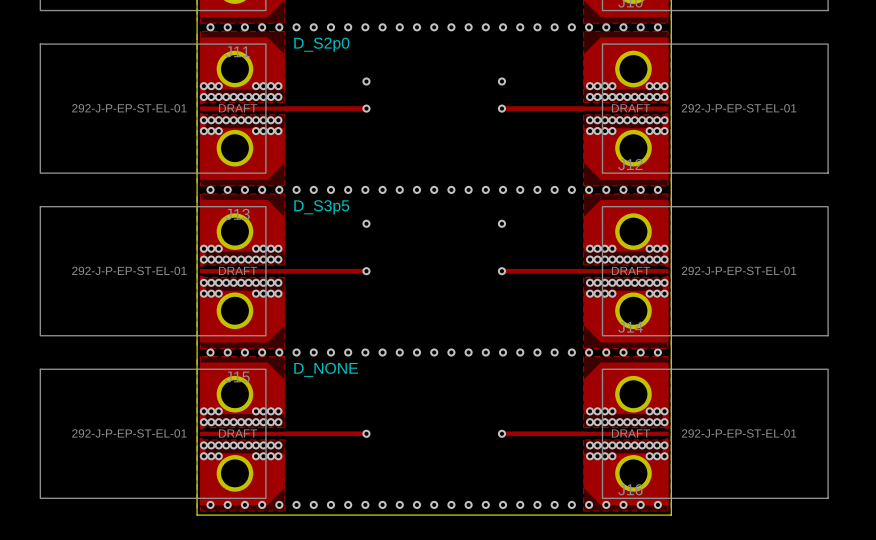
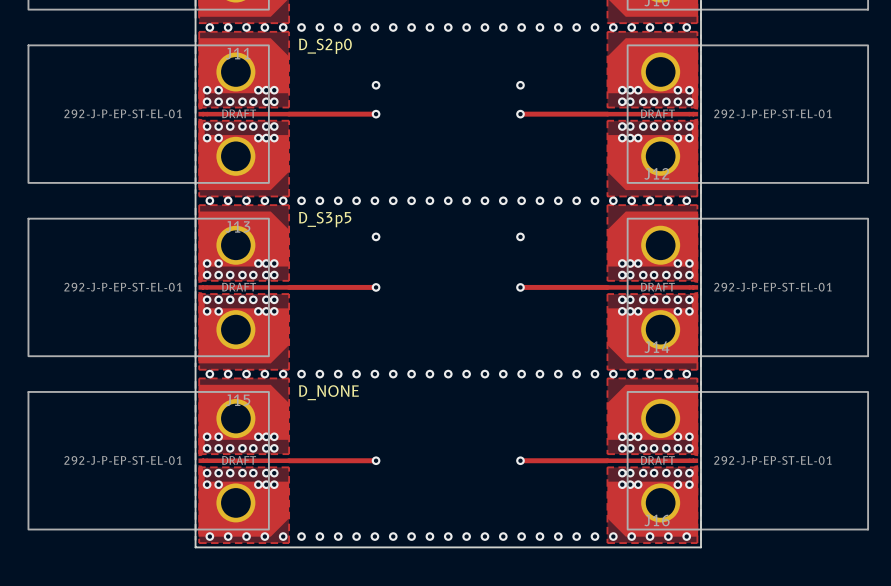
via: (203, 86) -> none
via: none -> (207, 90)
via: (211, 86) -> none
via: (278, 86) -> none
via: (590, 86) -> none
via: (657, 86) -> none
via: none -> (689, 90)
via: (664, 86) -> none
via: (203, 96) -> none
via: none -> (207, 101)
via: (211, 96) -> none
via: (226, 96) -> none
via: none -> (230, 101)
via: (233, 96) -> none
via: (248, 96) -> none
via: none -> (253, 101)
via: (256, 96) -> none
via: (278, 96) -> none
via: (590, 96) -> none
via: (612, 96) -> none
via: none -> (643, 101)
via: (619, 96) -> none
via: (634, 96) -> none
via: none -> (666, 101)
via: (642, 96) -> none
via: (657, 96) -> none
via: none -> (689, 101)
via: (664, 96) -> none
via: (203, 120) -> none
via: none -> (207, 126)
via: (211, 120) -> none
via: (226, 120) -> none
via: none -> (230, 126)
via: (233, 120) -> none
via: (248, 120) -> none
via: none -> (253, 126)
via: (256, 120) -> none
via: (278, 120) -> none
via: (590, 120) -> none
via: (612, 120) -> none
via: none -> (643, 126)
via: (619, 120) -> none
via: (634, 120) -> none
via: none -> (666, 126)
via: (642, 120) -> none
via: (657, 120) -> none
via: none -> (689, 126)
via: (664, 120) -> none
via: (203, 131) -> none
via: none -> (207, 138)
via: (211, 131) -> none
via: (278, 131) -> none
via: (590, 131) -> none
via: (657, 131) -> none
via: none -> (689, 138)
via: (664, 131) -> none
via: (203, 248) -> none
via: none -> (207, 263)
via: (211, 248) -> none
via: (278, 248) -> none
via: (590, 248) -> none
via: (657, 248) -> none
via: none -> (689, 263)
via: (664, 248) -> none
via: (203, 259) -> none
via: none -> (207, 275)
via: (211, 259) -> none
via: (226, 259) -> none
via: none -> (230, 275)
via: (233, 259) -> none
via: (248, 259) -> none
via: none -> (253, 275)
via: (256, 259) -> none
via: (278, 259) -> none
via: (590, 259) -> none
via: (612, 259) -> none
via: none -> (643, 275)
via: (619, 259) -> none
via: (634, 259) -> none
via: none -> (666, 275)
via: (642, 259) -> none
via: (657, 259) -> none
via: none -> (689, 275)
via: (664, 259) -> none
via: (203, 282) -> none
via: none -> (207, 299)
via: (211, 282) -> none
via: (226, 282) -> none
via: none -> (230, 299)
via: (233, 282) -> none
via: (248, 282) -> none
via: none -> (253, 299)
via: (256, 282) -> none
via: (278, 282) -> none
via: (590, 282) -> none
via: (612, 282) -> none
via: none -> (643, 299)
via: (619, 282) -> none
via: (634, 282) -> none
via: none -> (666, 299)
via: (642, 282) -> none
via: (657, 282) -> none
via: none -> (689, 299)
via: (664, 282) -> none
via: (203, 293) -> none
via: none -> (207, 311)
via: (211, 293) -> none
via: (278, 293) -> none
via: (590, 293) -> none
via: (657, 293) -> none
via: none -> (689, 311)
via: (664, 293) -> none
via: (203, 411) -> none
via: none -> (207, 436)
via: (211, 411) -> none
via: (278, 411) -> none
via: (590, 411) -> none
via: (657, 411) -> none
via: none -> (689, 436)
via: (664, 411) -> none
via: (203, 422) -> none
via: none -> (207, 448)
via: (211, 422) -> none
via: (226, 422) -> none
via: none -> (230, 448)
via: (233, 422) -> none
via: (248, 422) -> none
via: none -> (253, 448)
via: (256, 422) -> none
via: (278, 422) -> none
via: (590, 422) -> none
via: (612, 422) -> none
via: none -> (643, 448)
via: (619, 422) -> none
via: (634, 422) -> none
via: none -> (666, 448)
via: (642, 422) -> none
via: (657, 422) -> none
via: none -> (689, 448)
via: (664, 422) -> none
via: (203, 445) -> none
via: none -> (207, 473)
via: (211, 445) -> none
via: (226, 445) -> none
via: none -> (230, 473)
via: (233, 445) -> none
via: (248, 445) -> none
via: none -> (253, 473)
via: (256, 445) -> none
via: (278, 445) -> none
via: (590, 445) -> none
via: (612, 445) -> none
via: none -> (643, 473)
via: (619, 445) -> none
via: (634, 445) -> none
via: none -> (666, 473)
via: (642, 445) -> none
via: (657, 445) -> none
via: none -> (689, 473)
via: (664, 445) -> none
via: (203, 456) -> none
via: none -> (207, 484)
via: (211, 456) -> none
via: (278, 456) -> none
via: (590, 456) -> none
via: (657, 456) -> none
via: none -> (689, 484)
via: (664, 456) -> none

